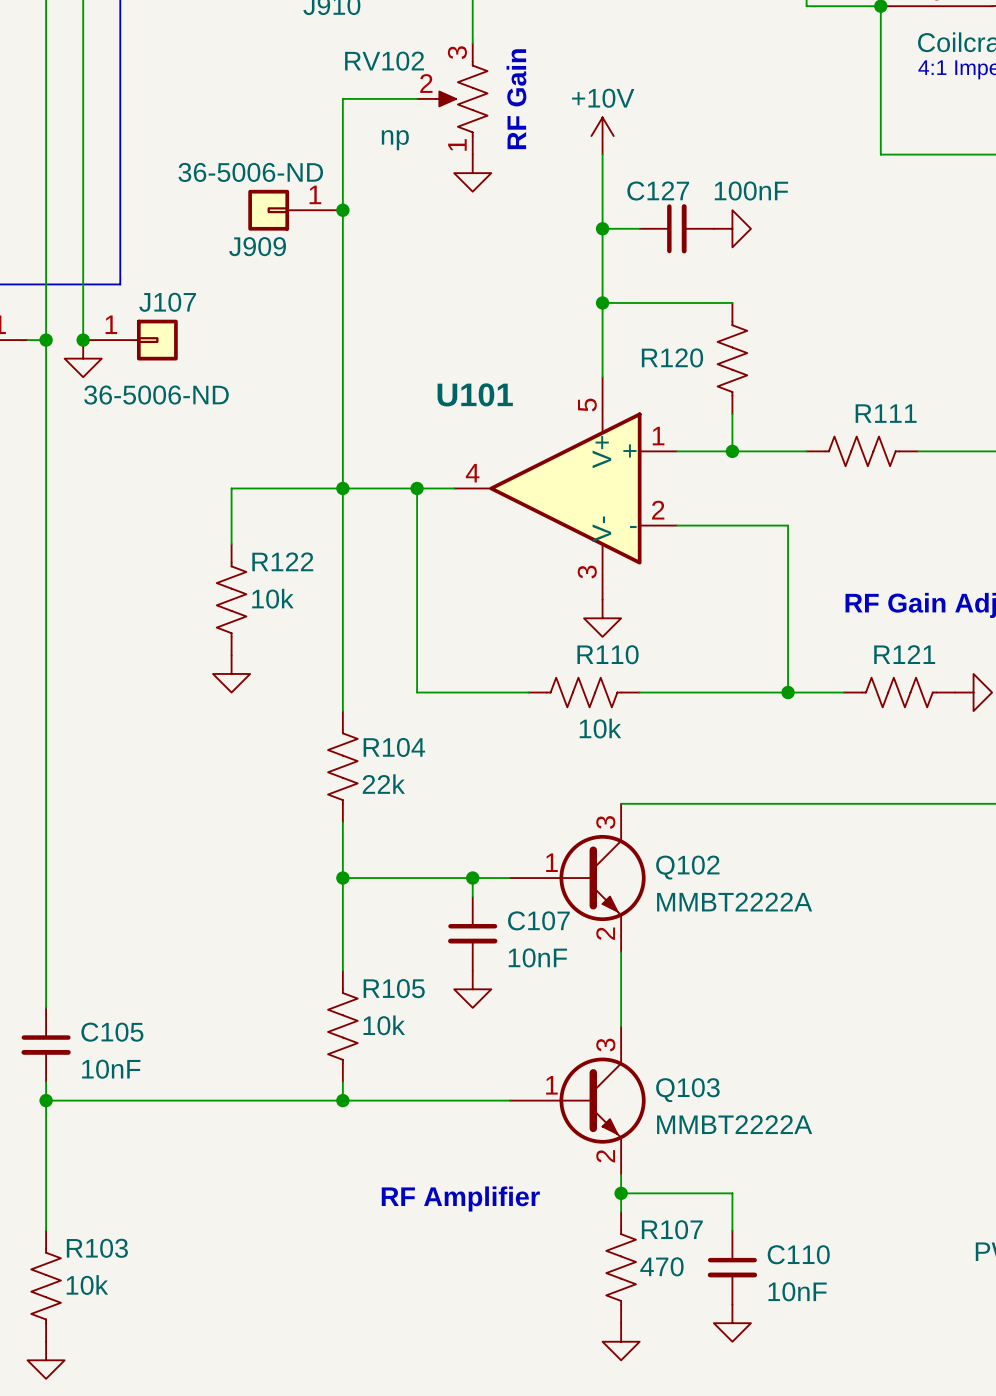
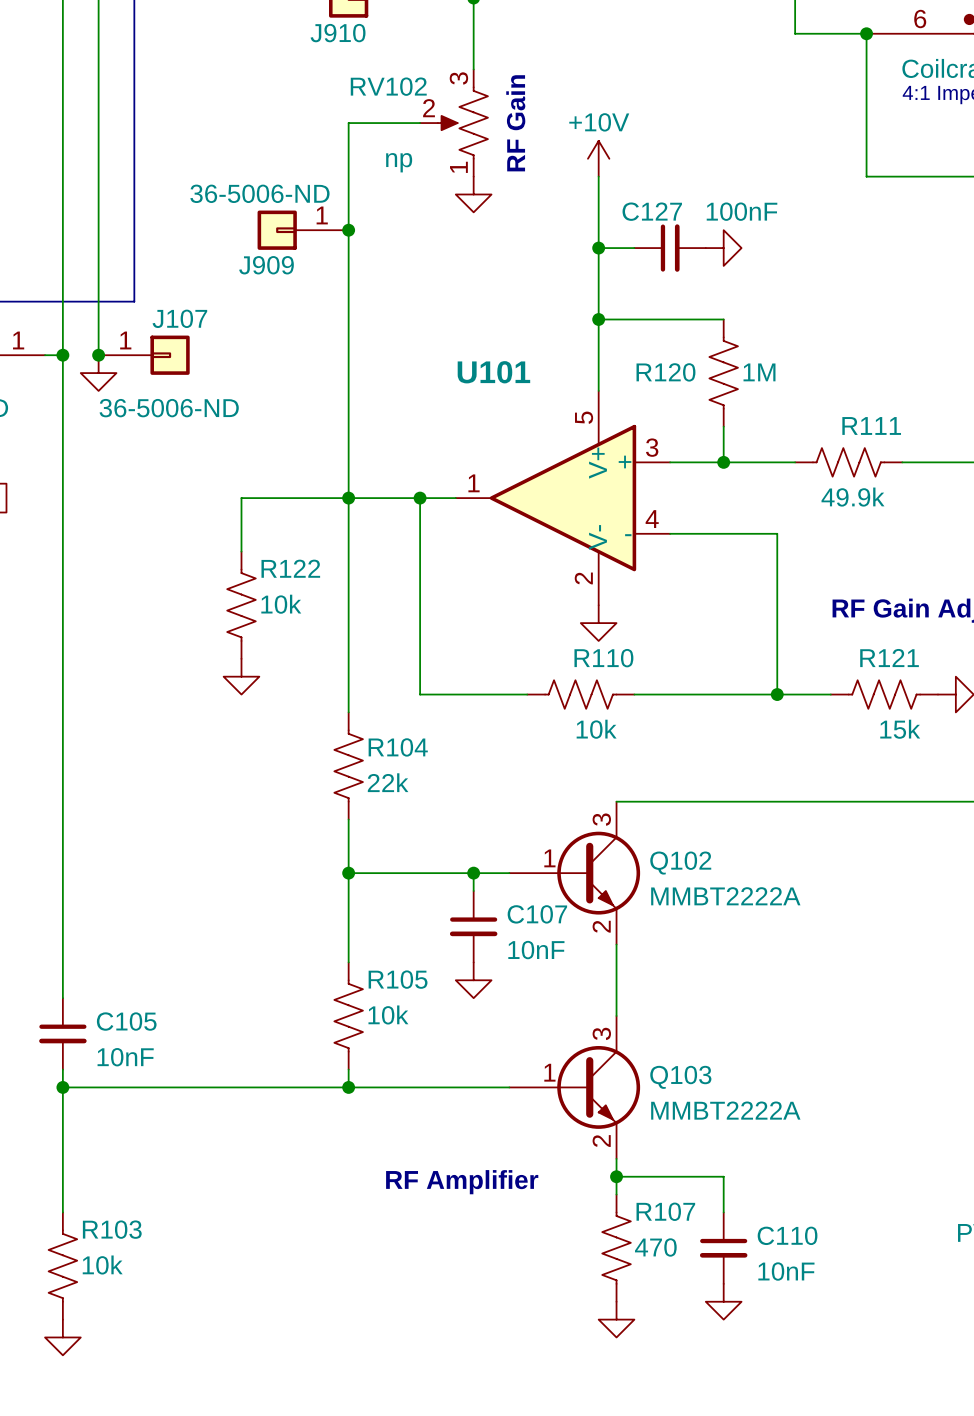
R120 value: none -> 1M (759, 372)
U101 name position: U101 (475, 394) -> U101 (493, 372)
U101 pin number: 1 (658, 436) -> 3 (652, 447)
U101 pin number: 4 (472, 473) -> 1 (474, 483)
R111 value: none -> 49.9k (852, 497)
U101 pin number: 2 (658, 510) -> 4 (652, 519)
U101 pin number: 3 (587, 572) -> 2 (583, 578)
R121 value: none -> 15k (900, 729)

